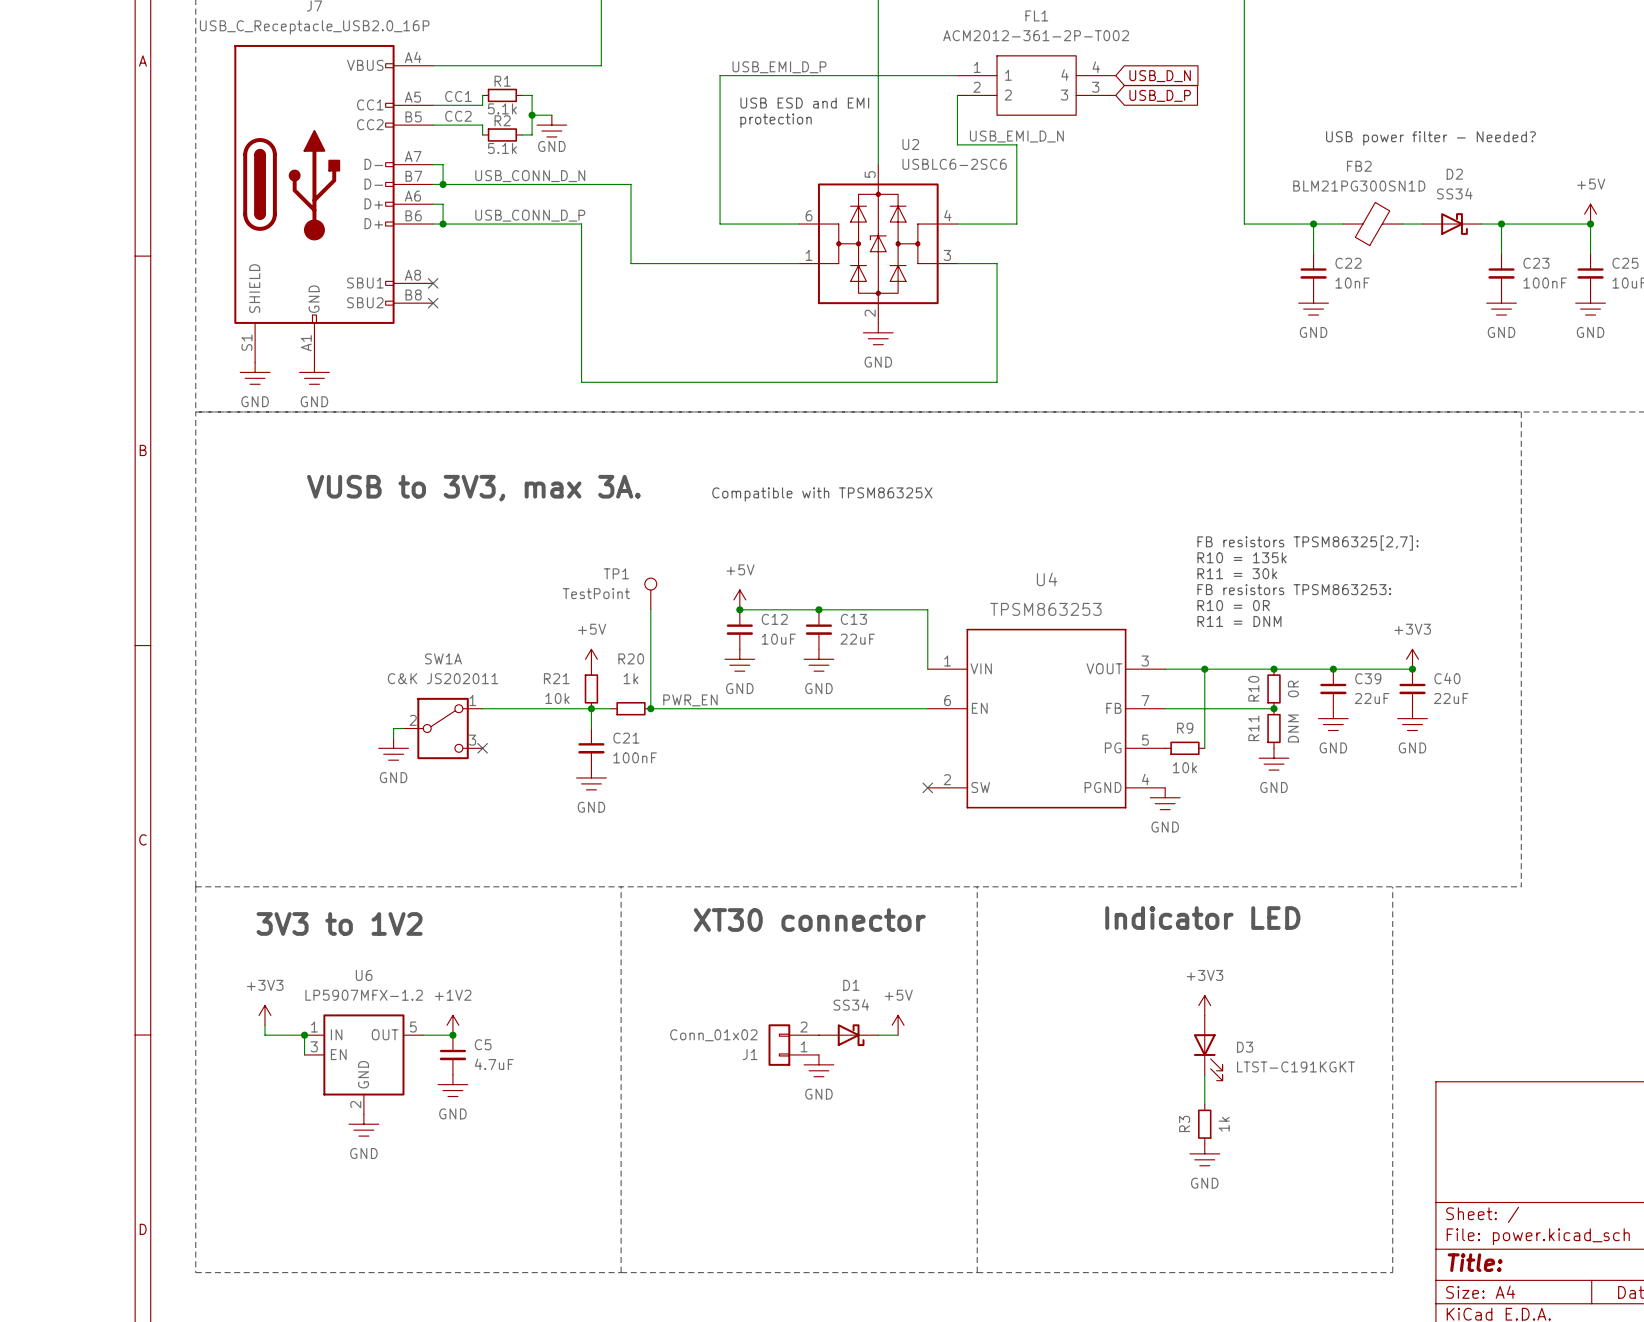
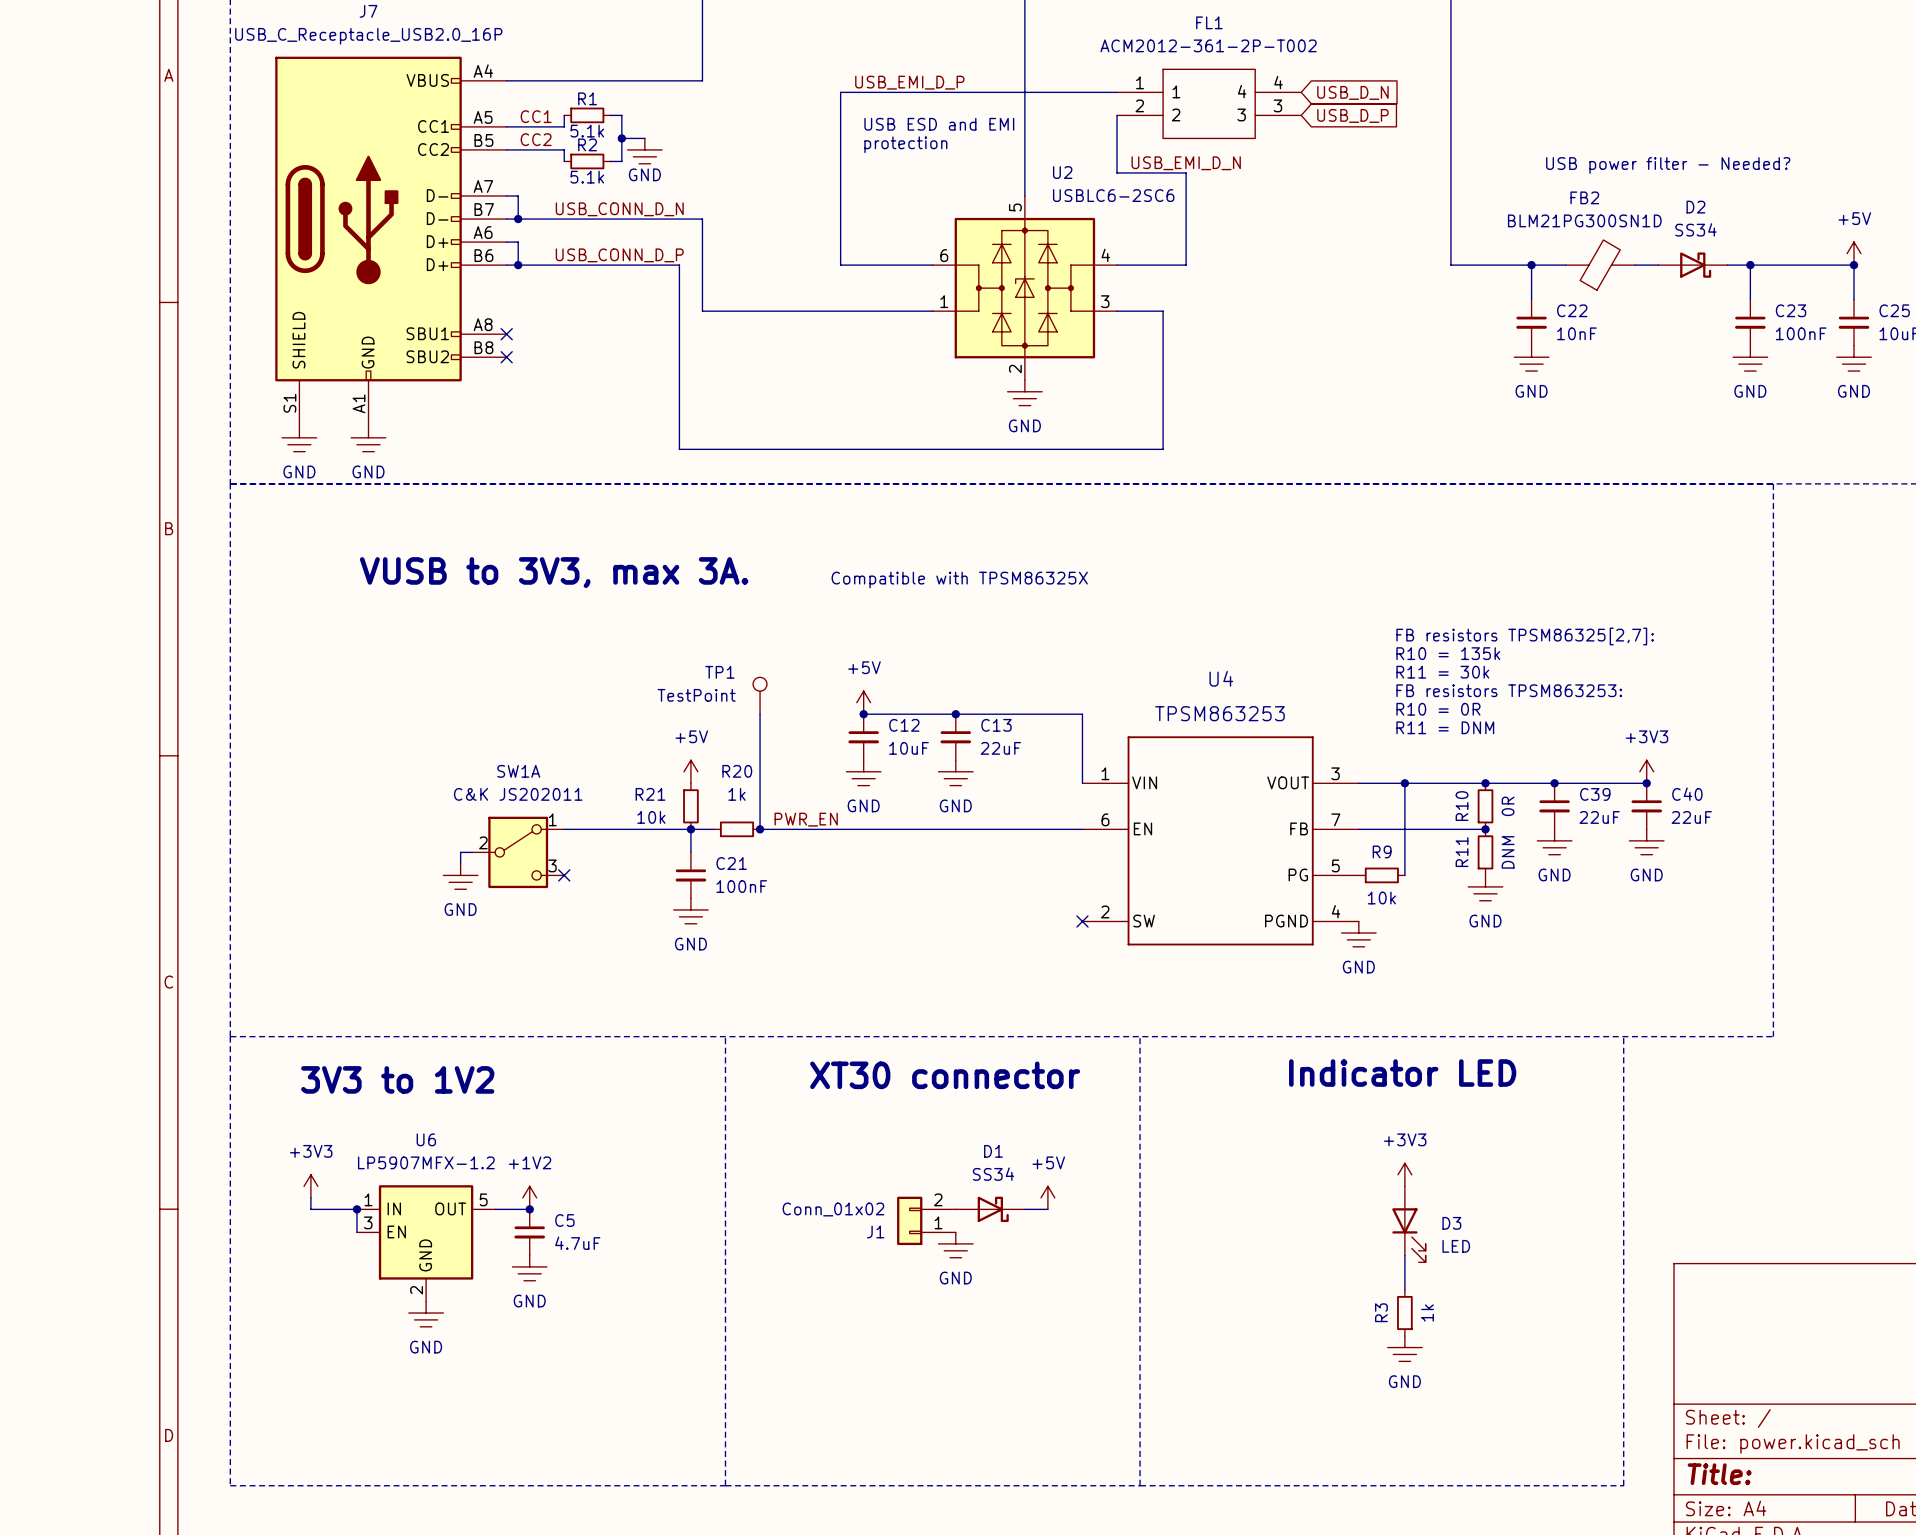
wire: (601, 184) (631, 184) (631, 263) -> (702, 219) (702, 311) (737, 311)
D3 value: LTST-C191KGKT (1295, 1066) -> LED (1456, 1246)

